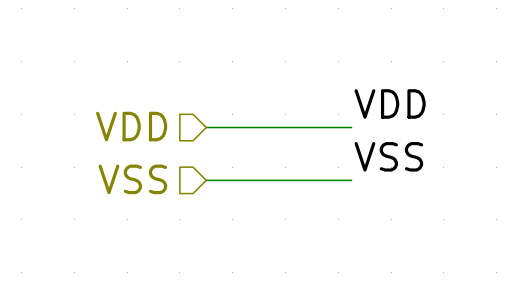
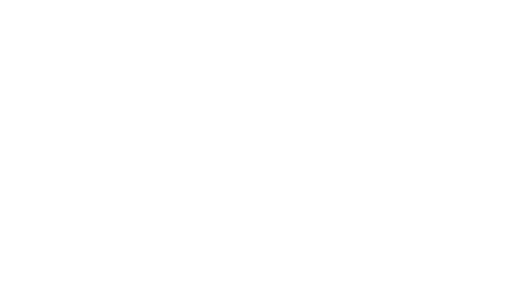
label: VDD (390, 103) -> none
hierarchical label: VDD (131, 126) -> none
wire: (206, 127) (351, 127) -> none
label: VSS (388, 156) -> none
hierarchical label: VSS (132, 179) -> none
wire: (206, 180) (351, 180) -> none

